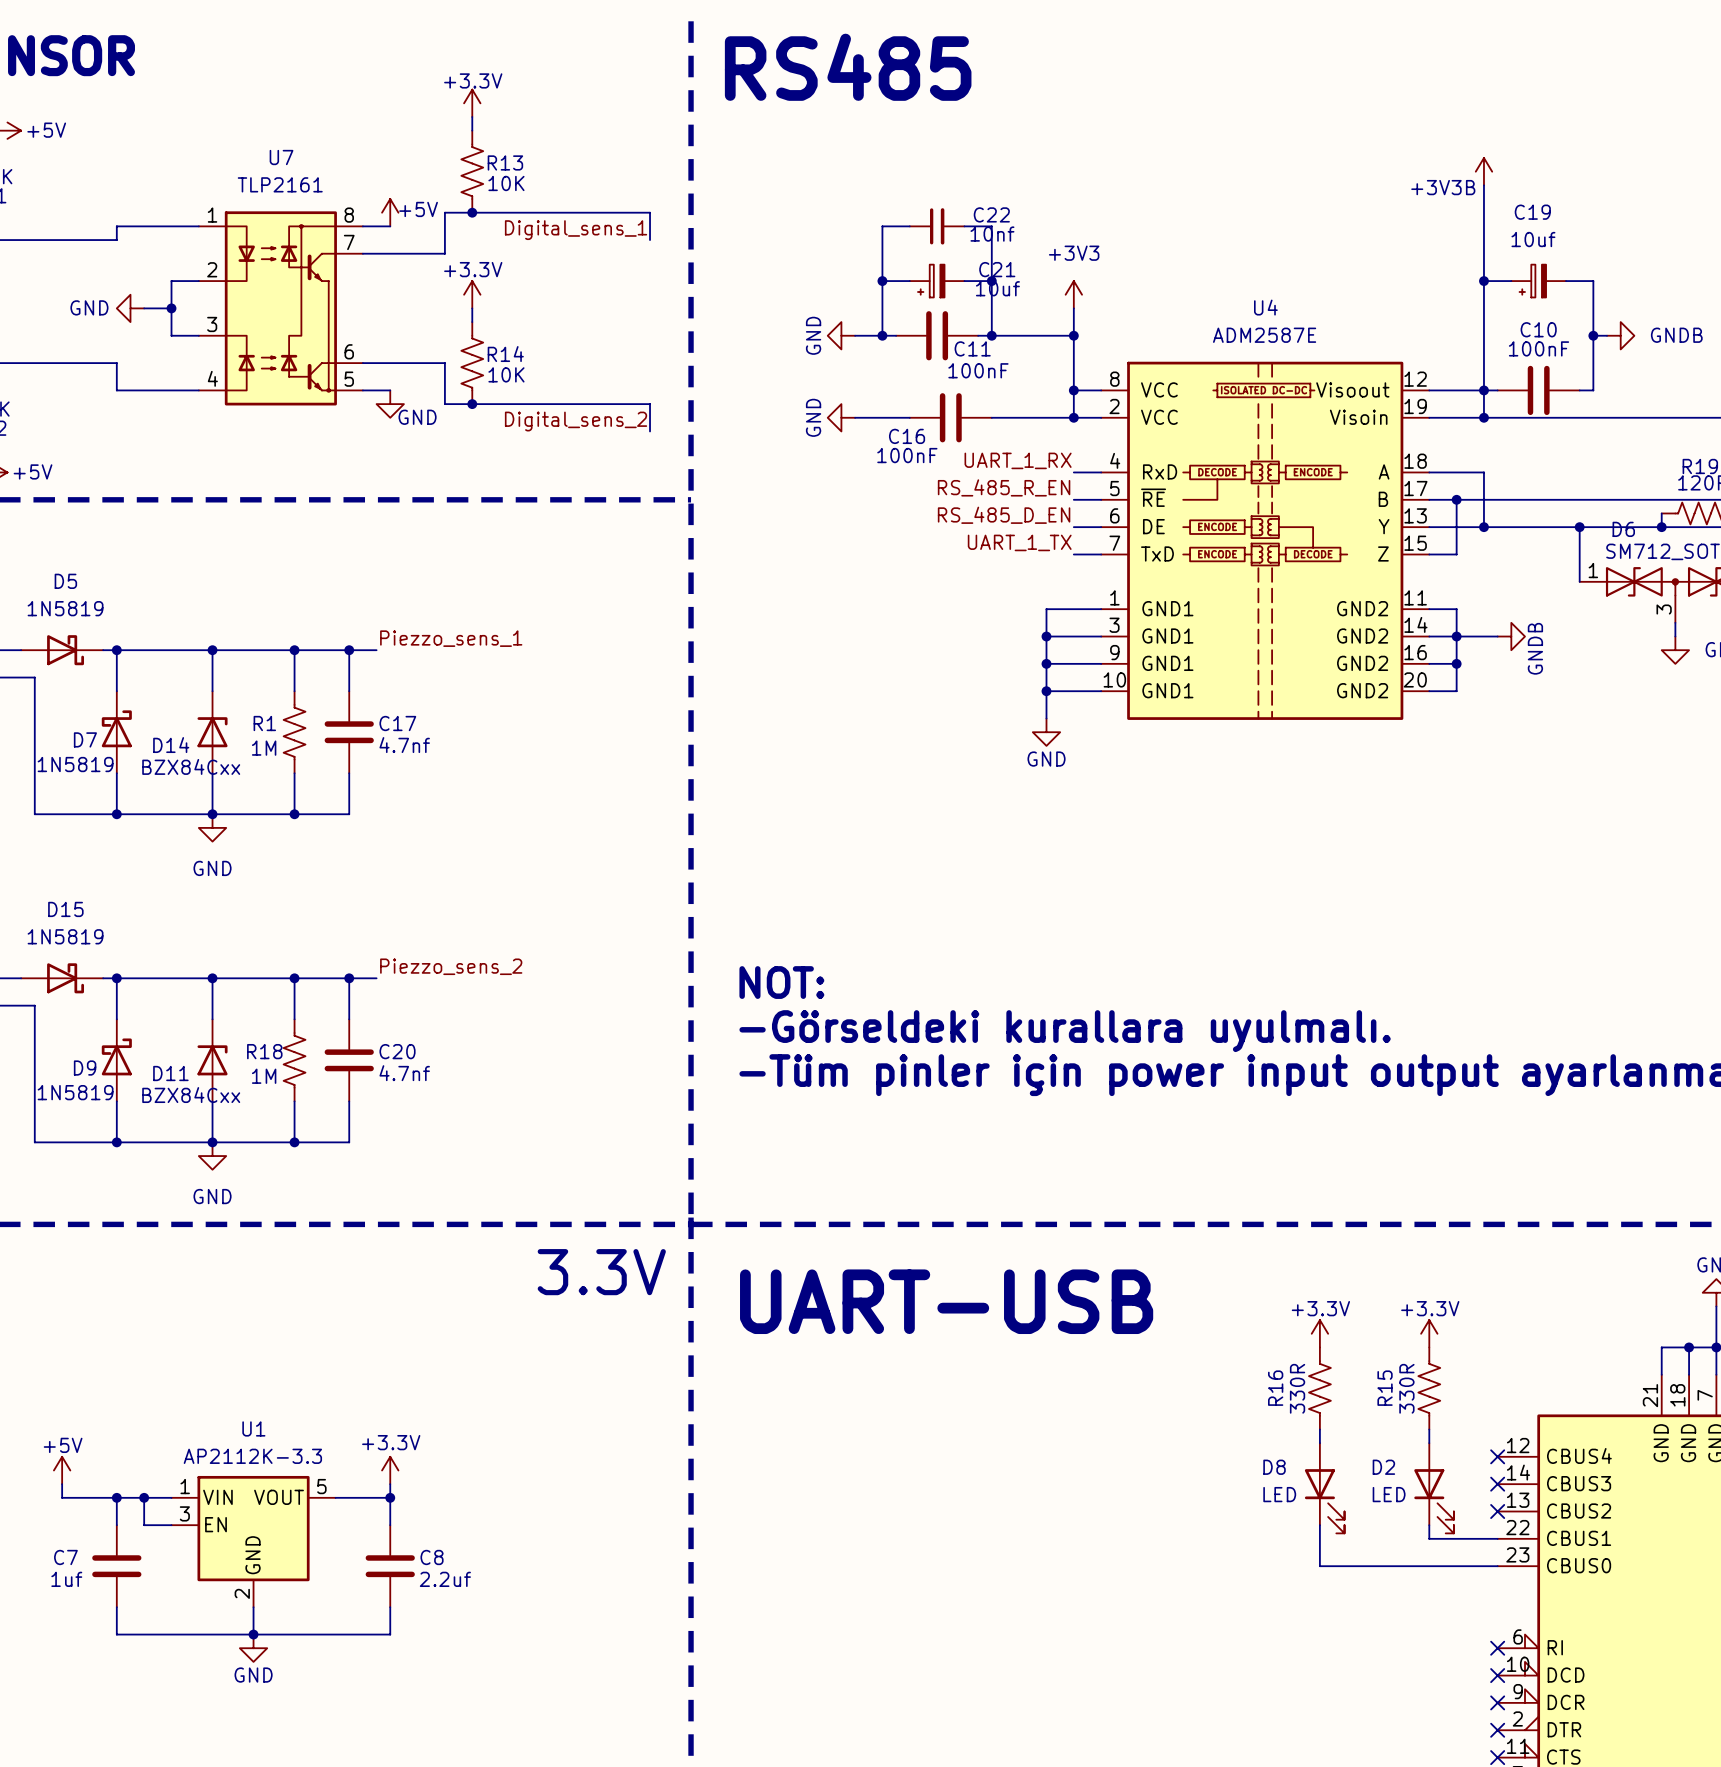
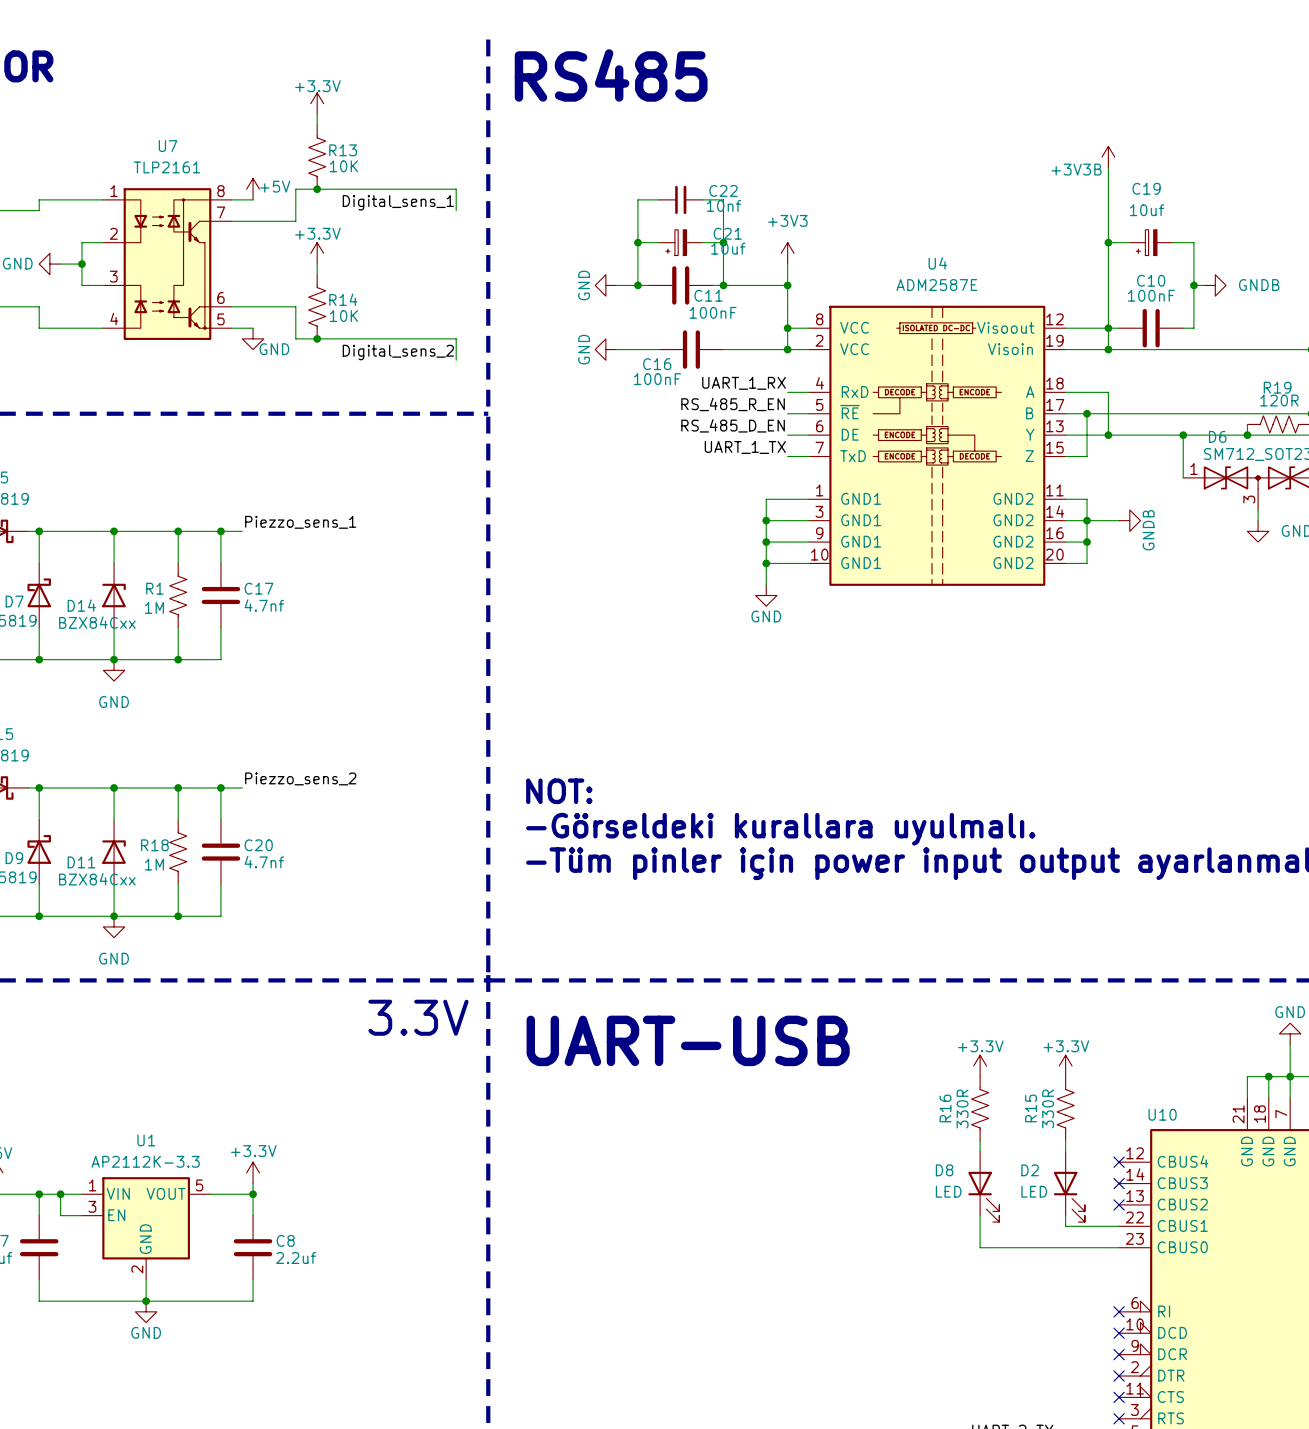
U10 name: none -> U10 (1162, 1114)

